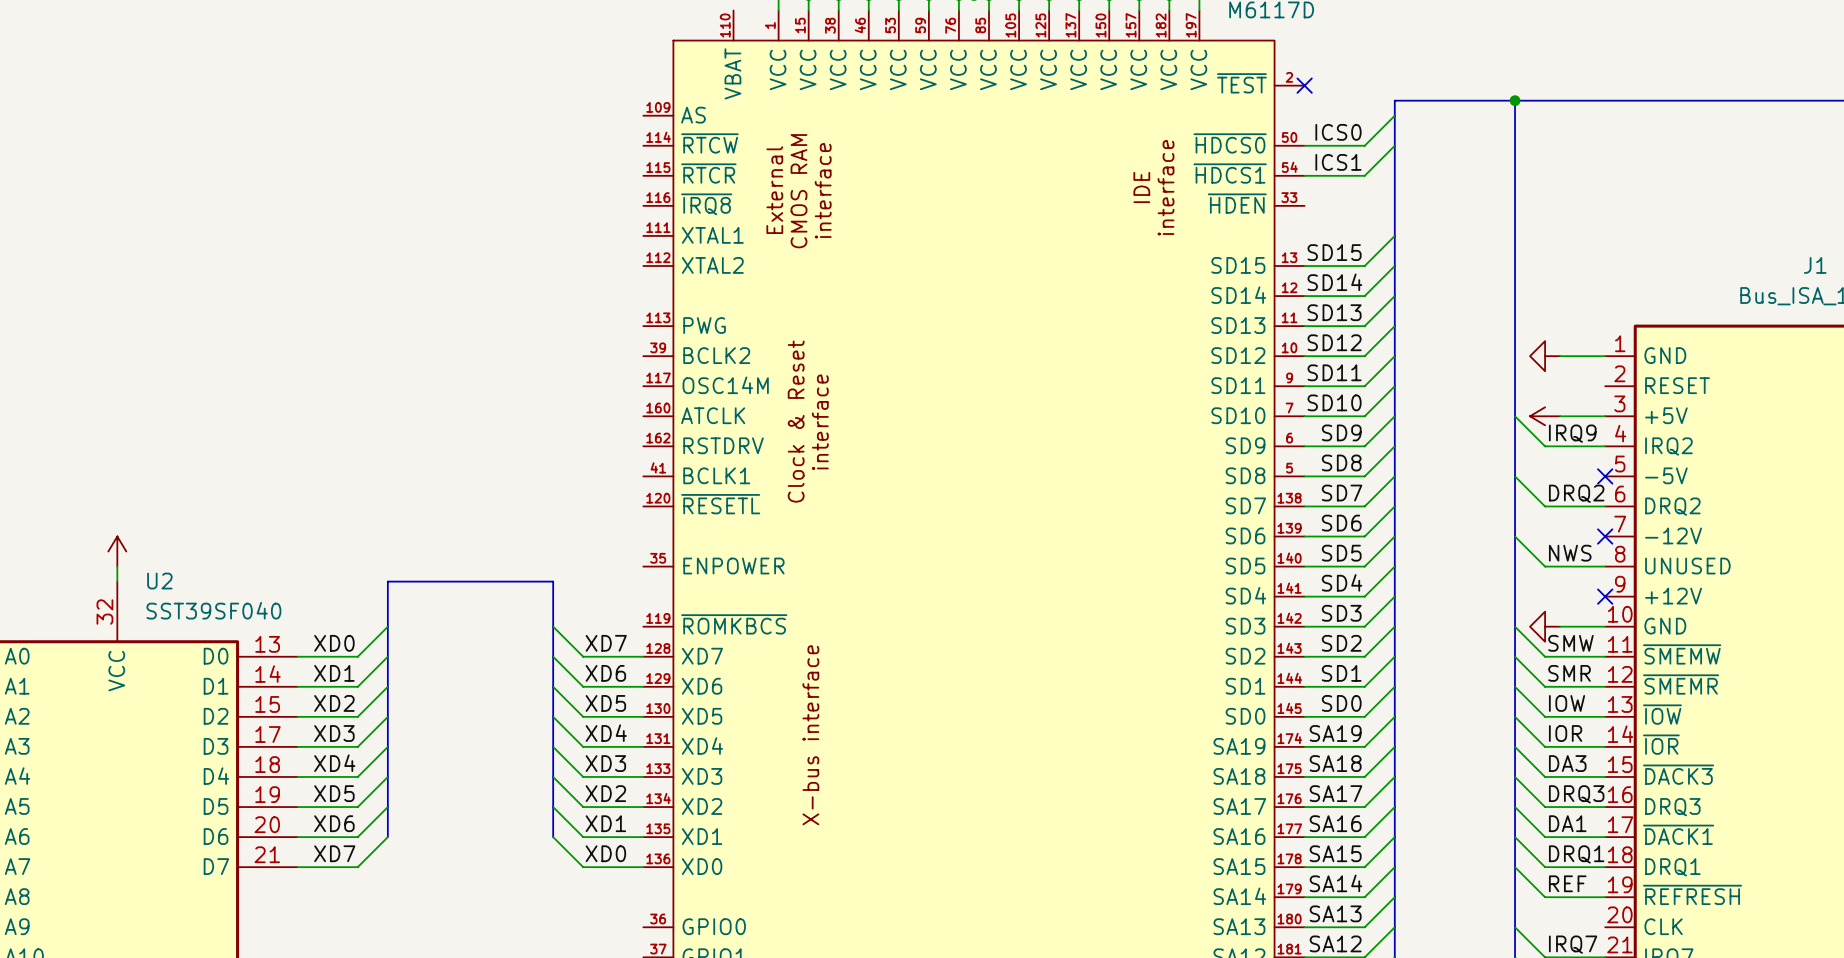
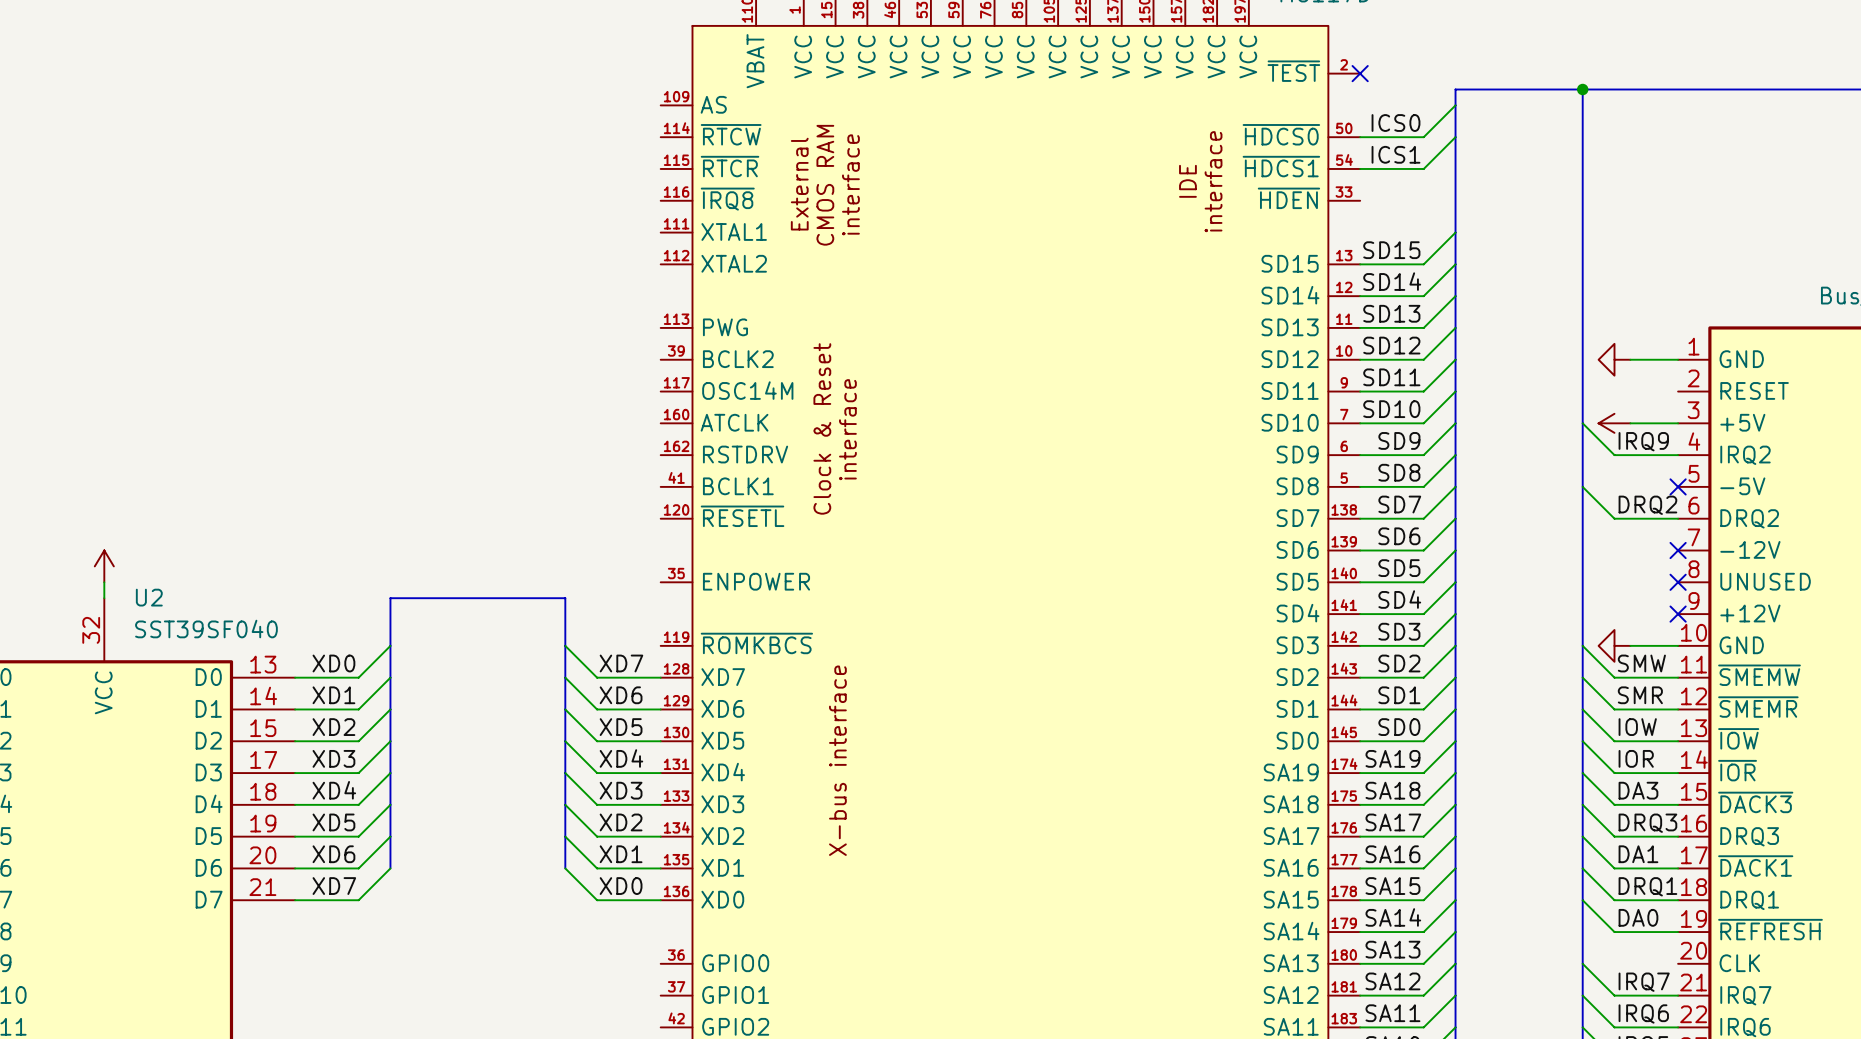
wire: (1515, 536) (1545, 566) (1605, 566) -> none
label: NWS (1570, 553) -> none
no-connect mark: none -> (1678, 582)
label: REF (1567, 883) -> DA0 (1638, 917)

